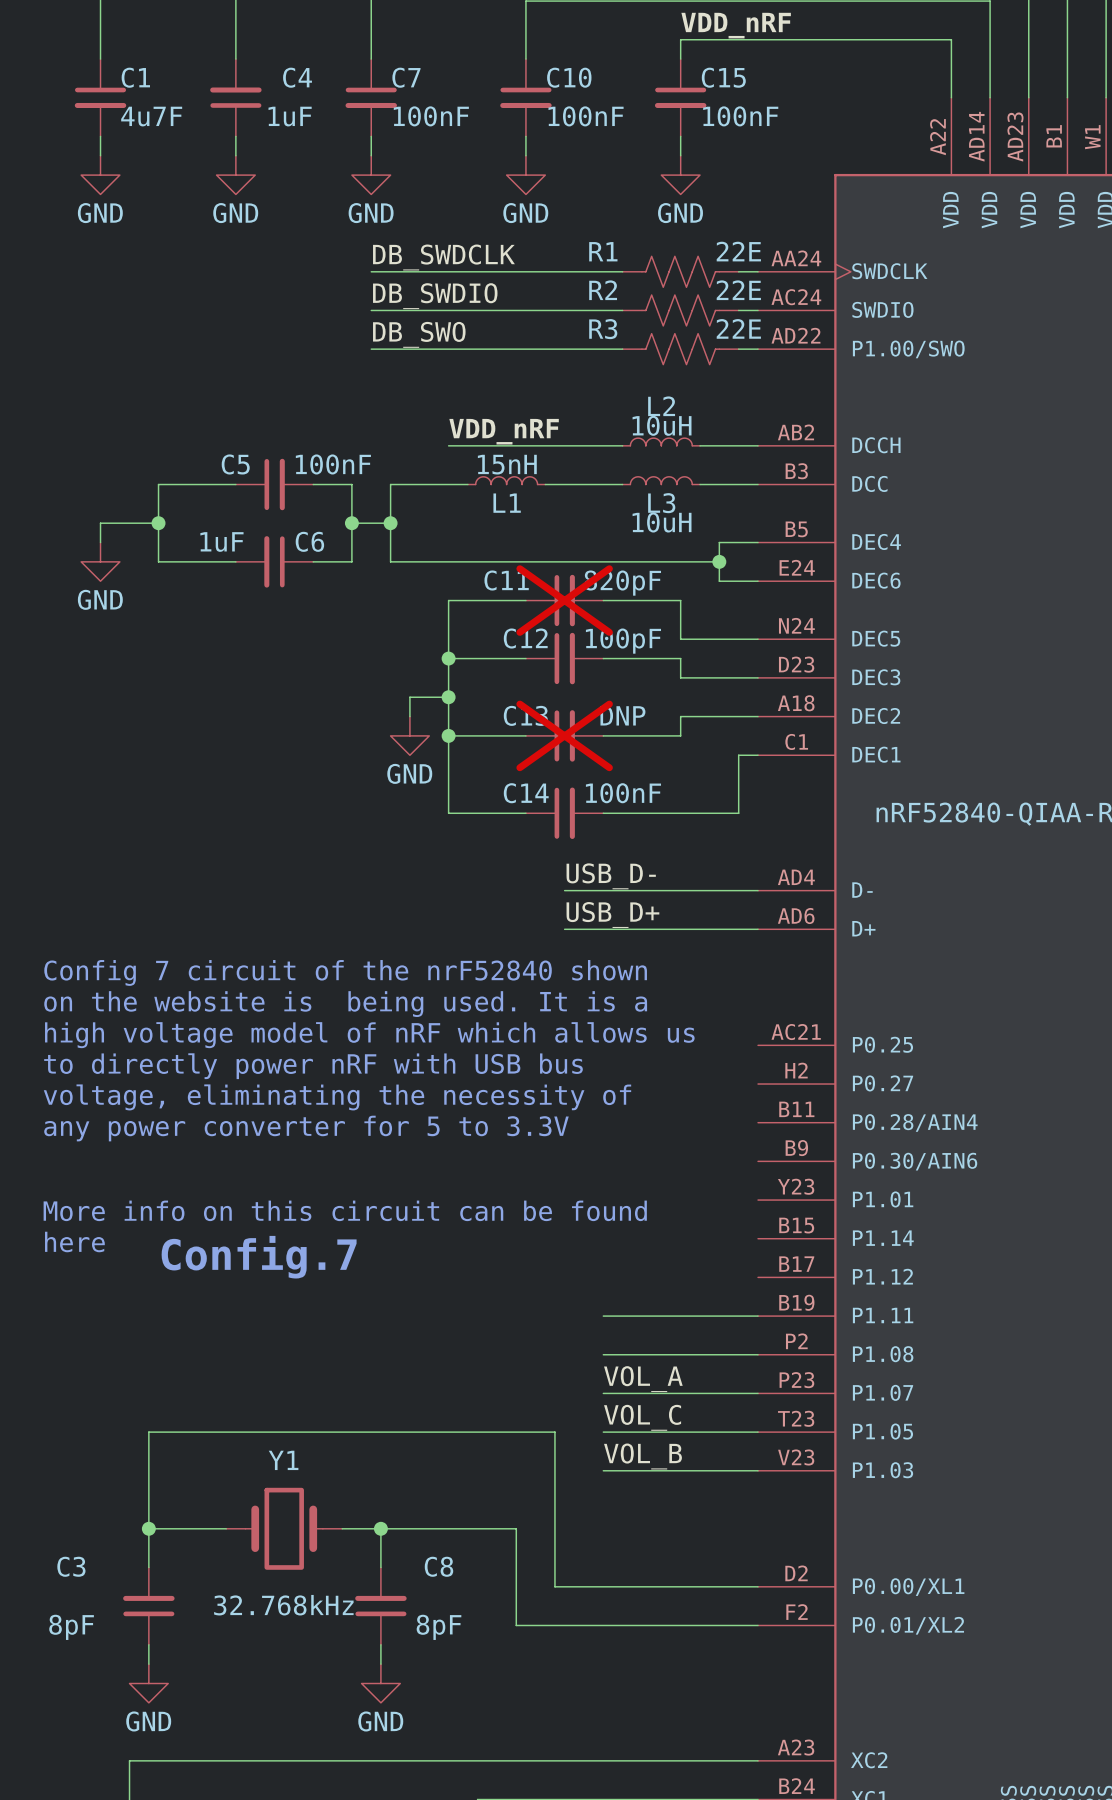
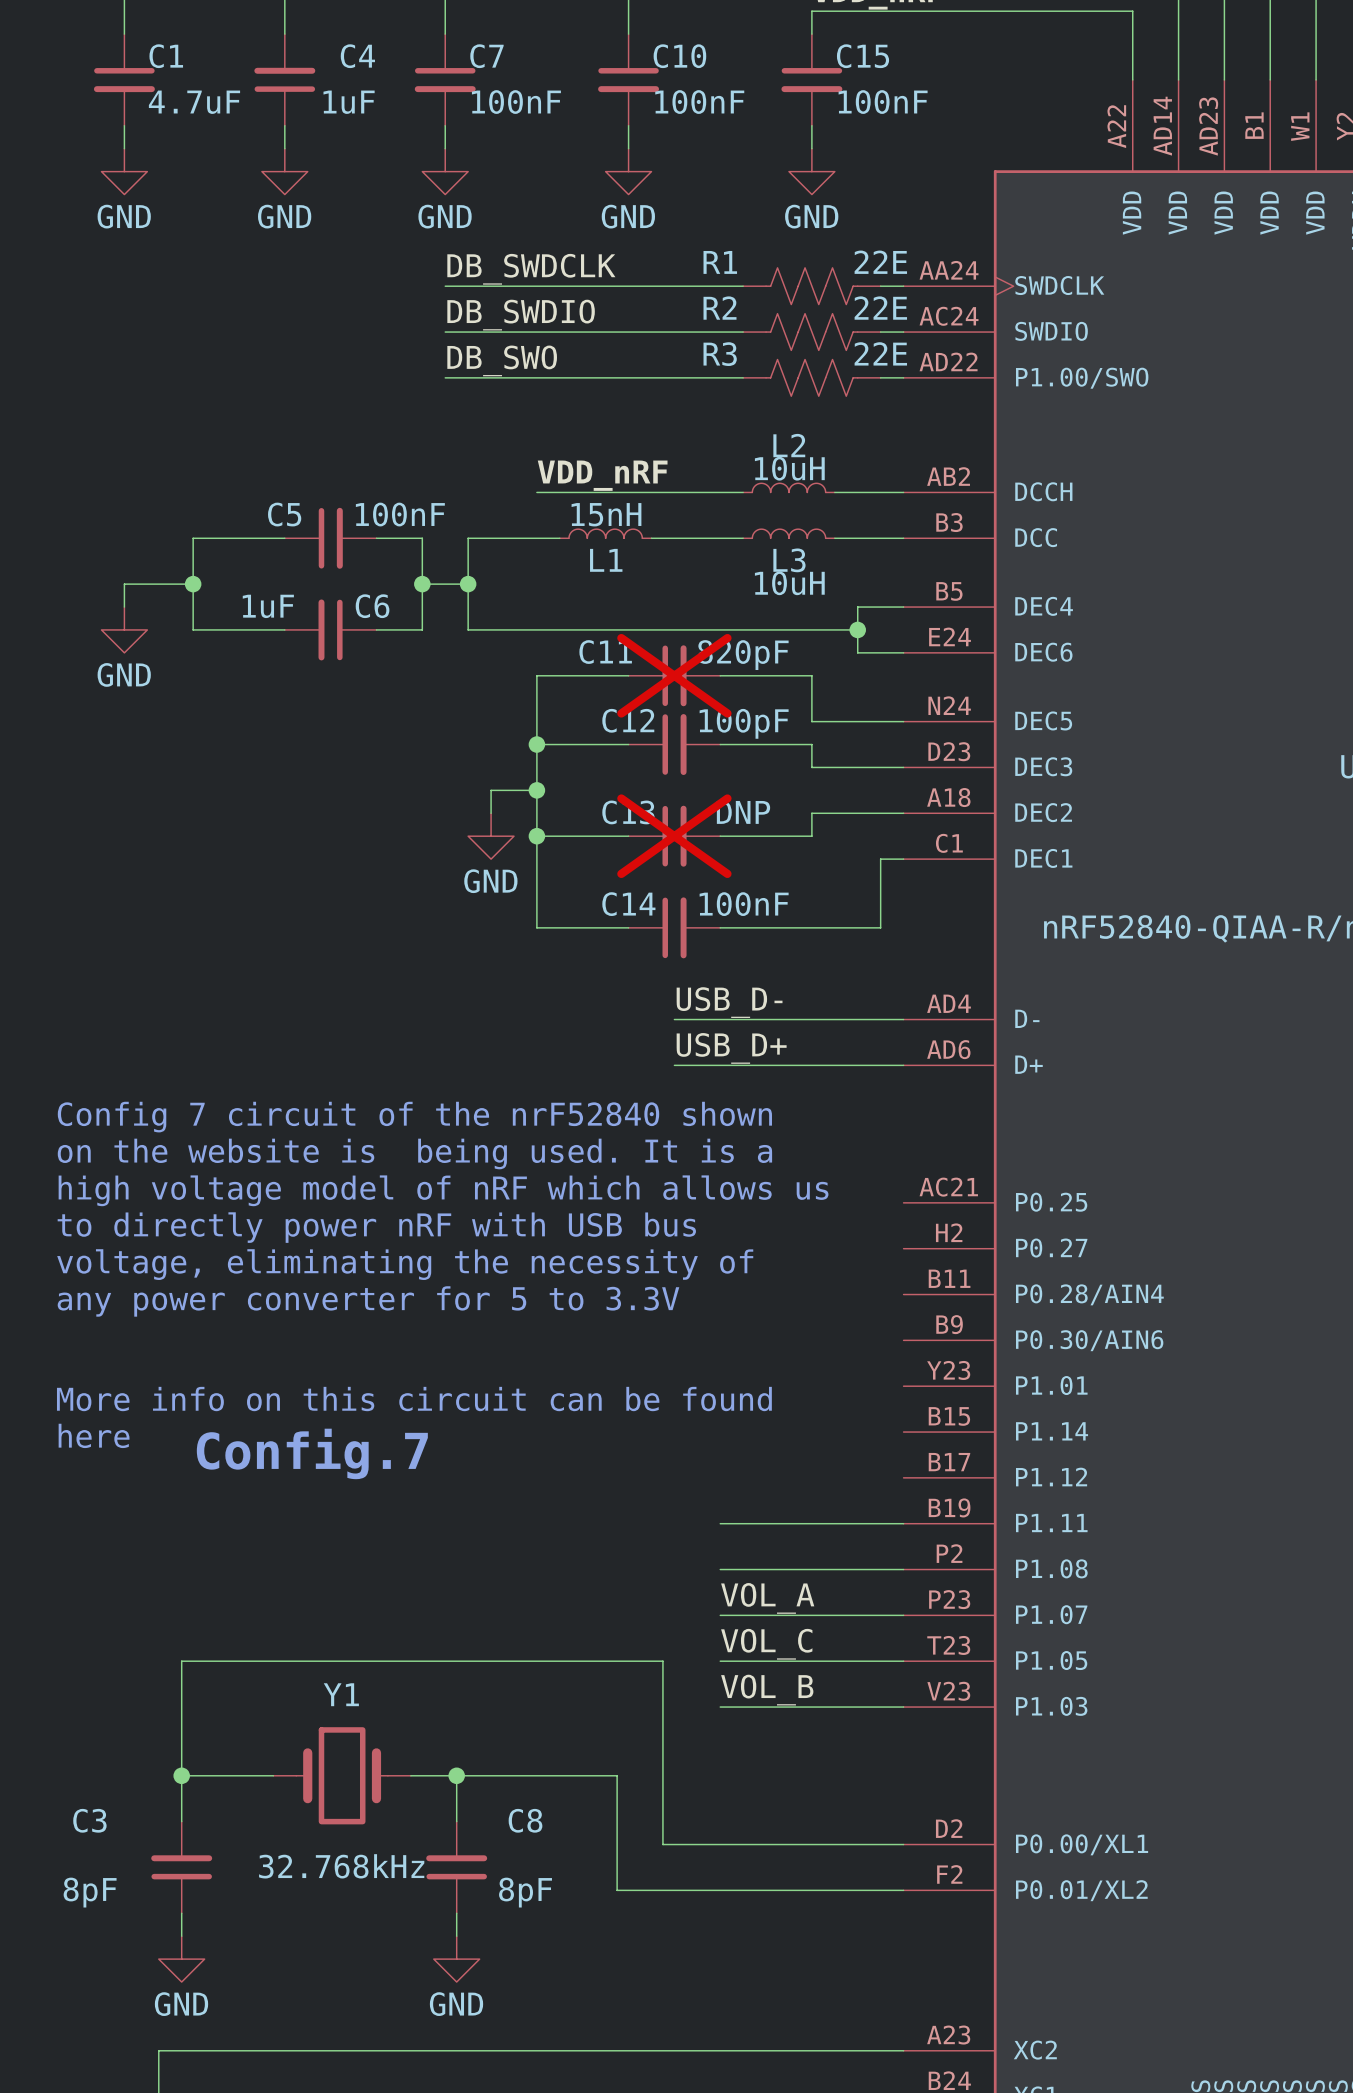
C1 value: 4u7F (151, 116) -> 4.7uF (194, 102)

